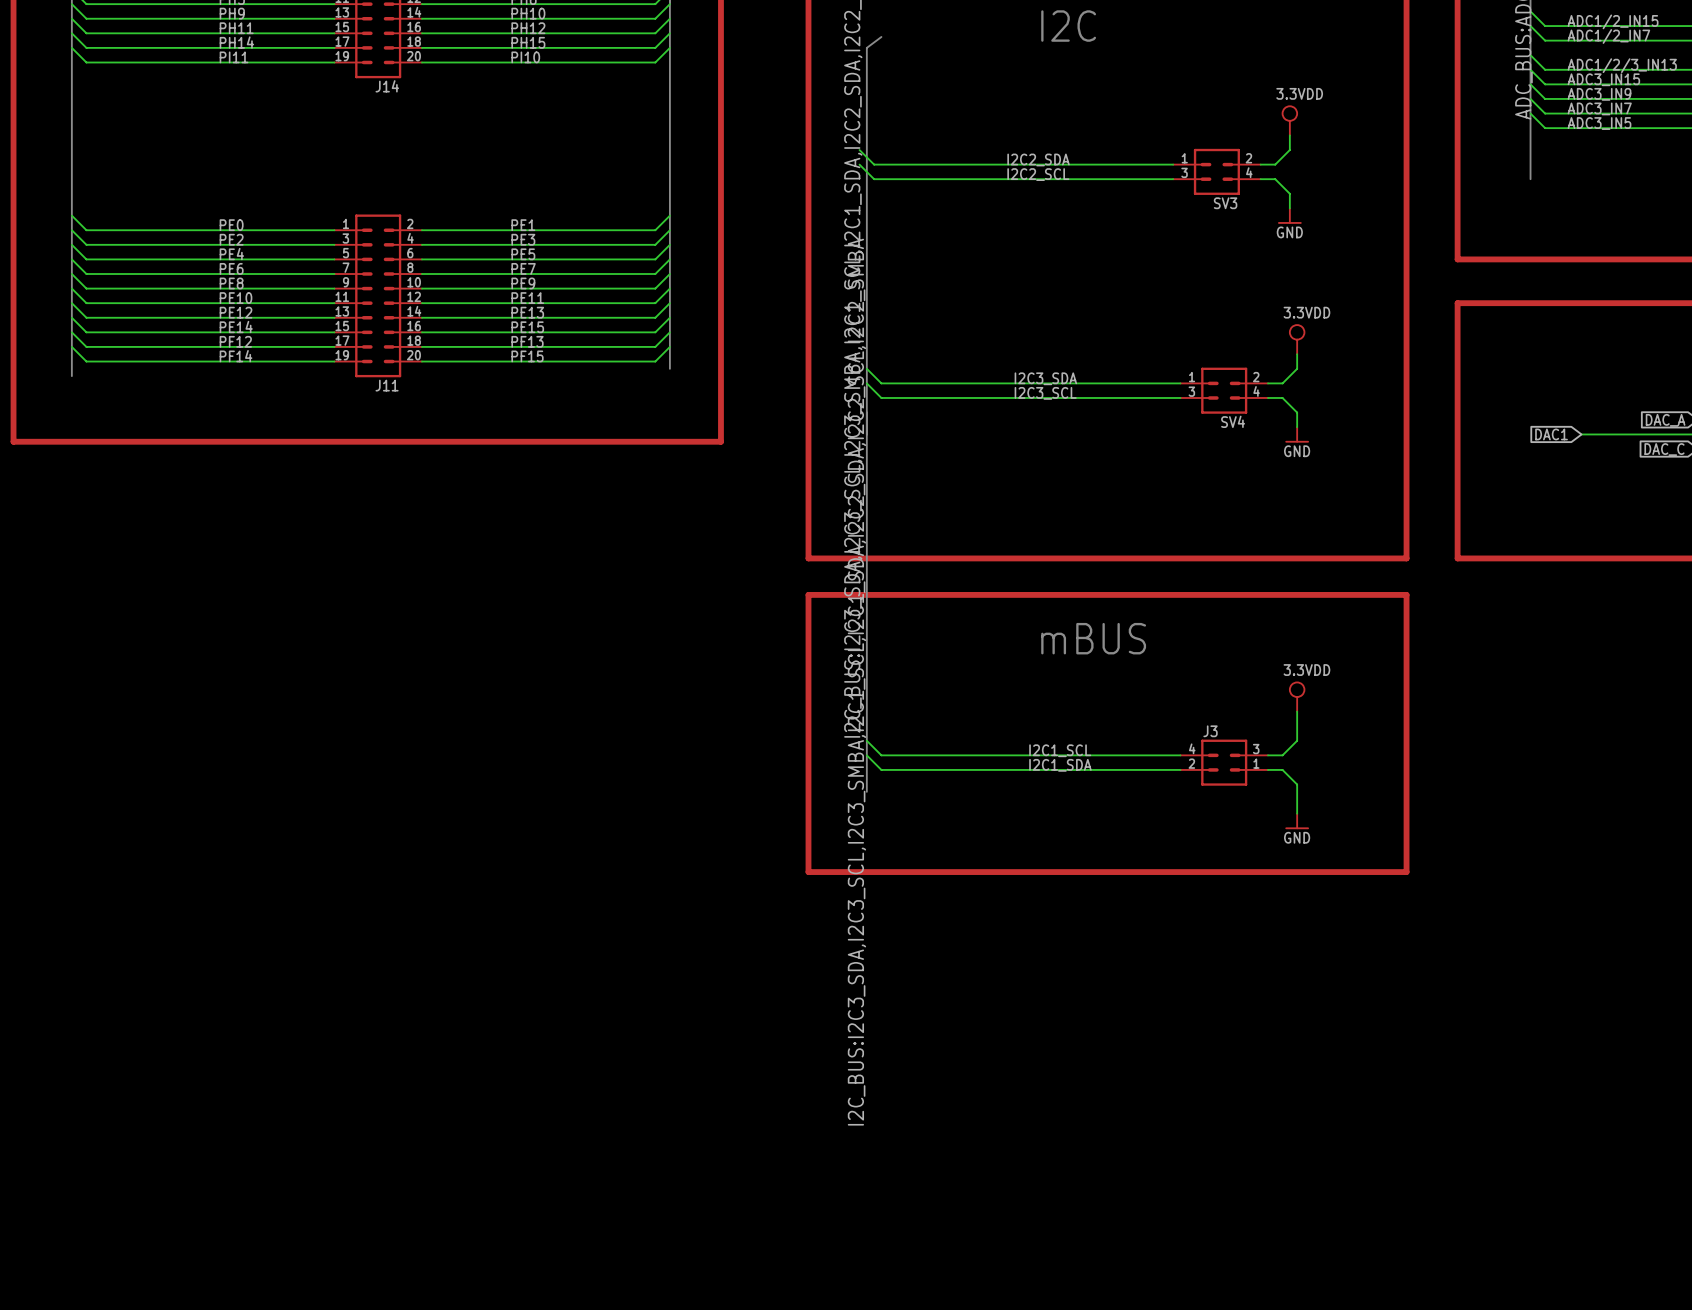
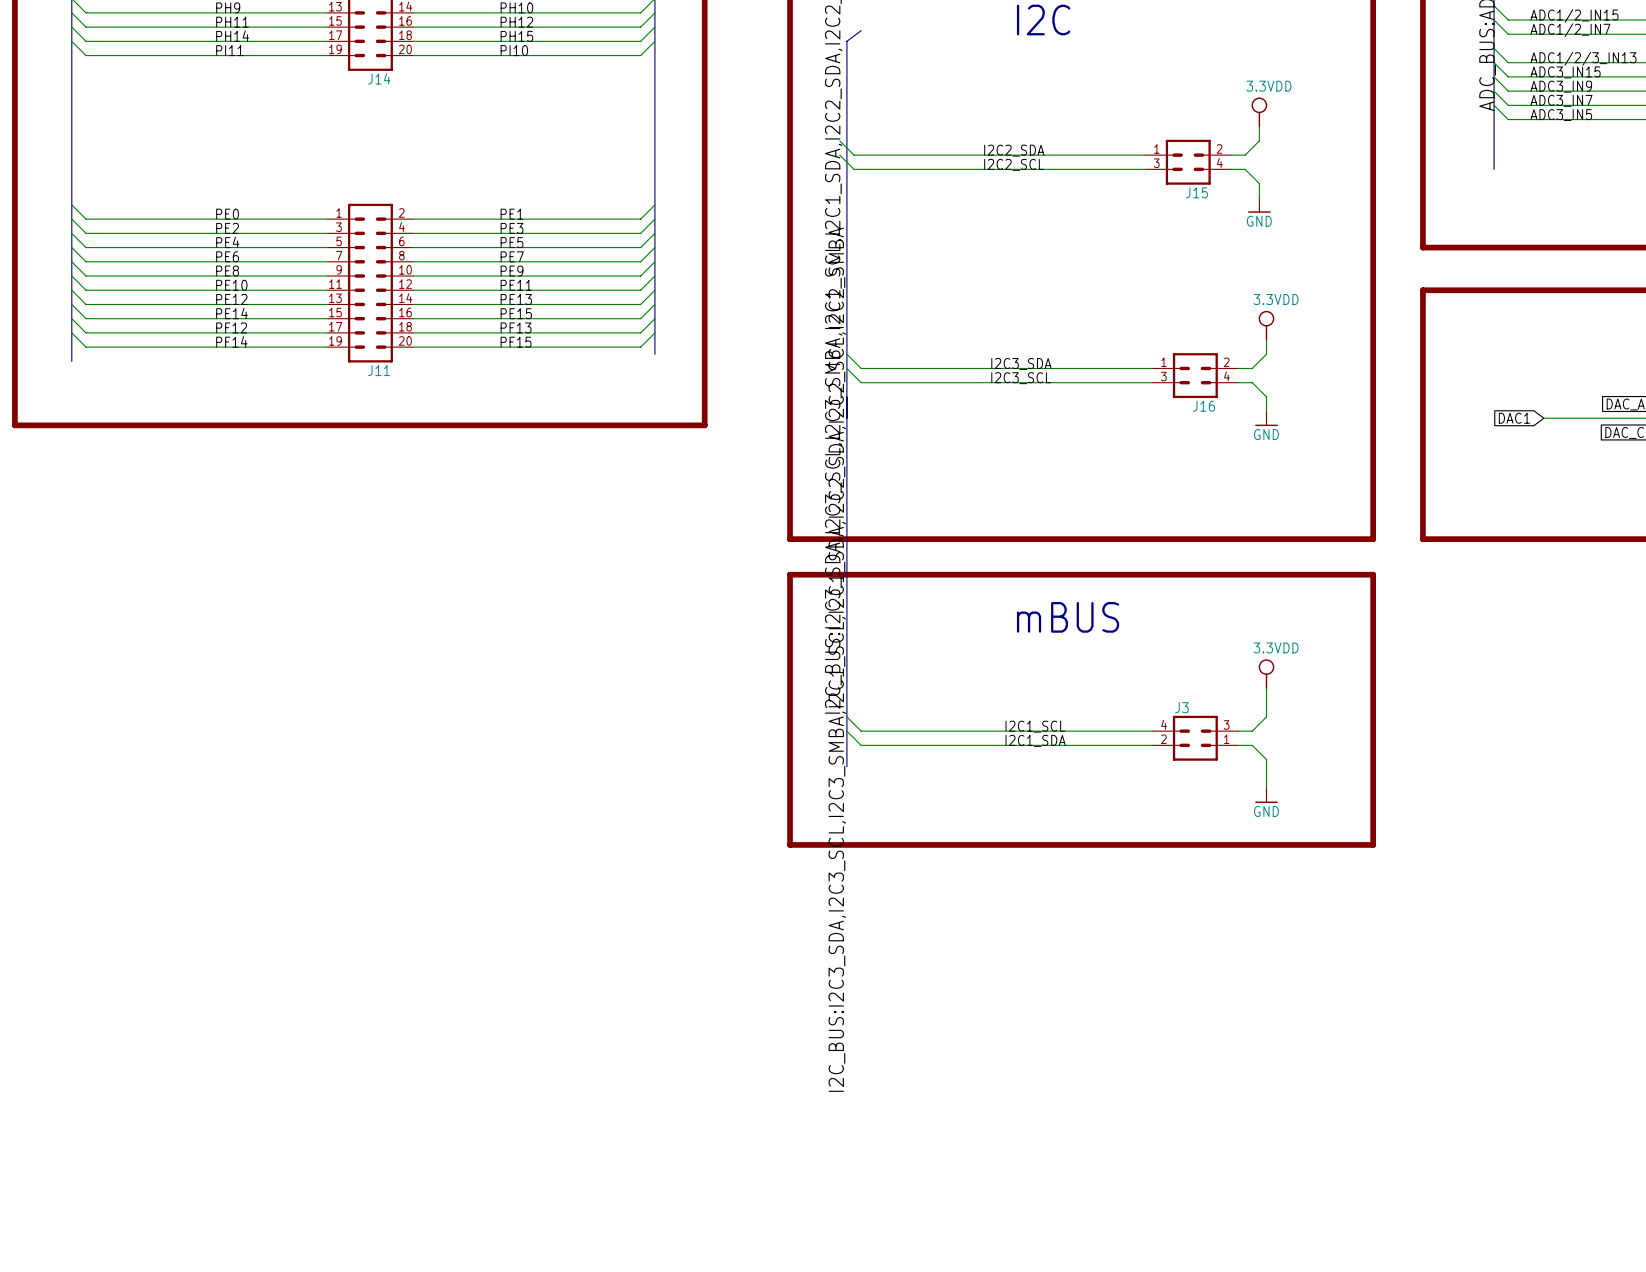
SV3 name: SV3 (1225, 203) -> J15 (1196, 192)
SV4 name: SV4 (1233, 421) -> J16 (1204, 406)

